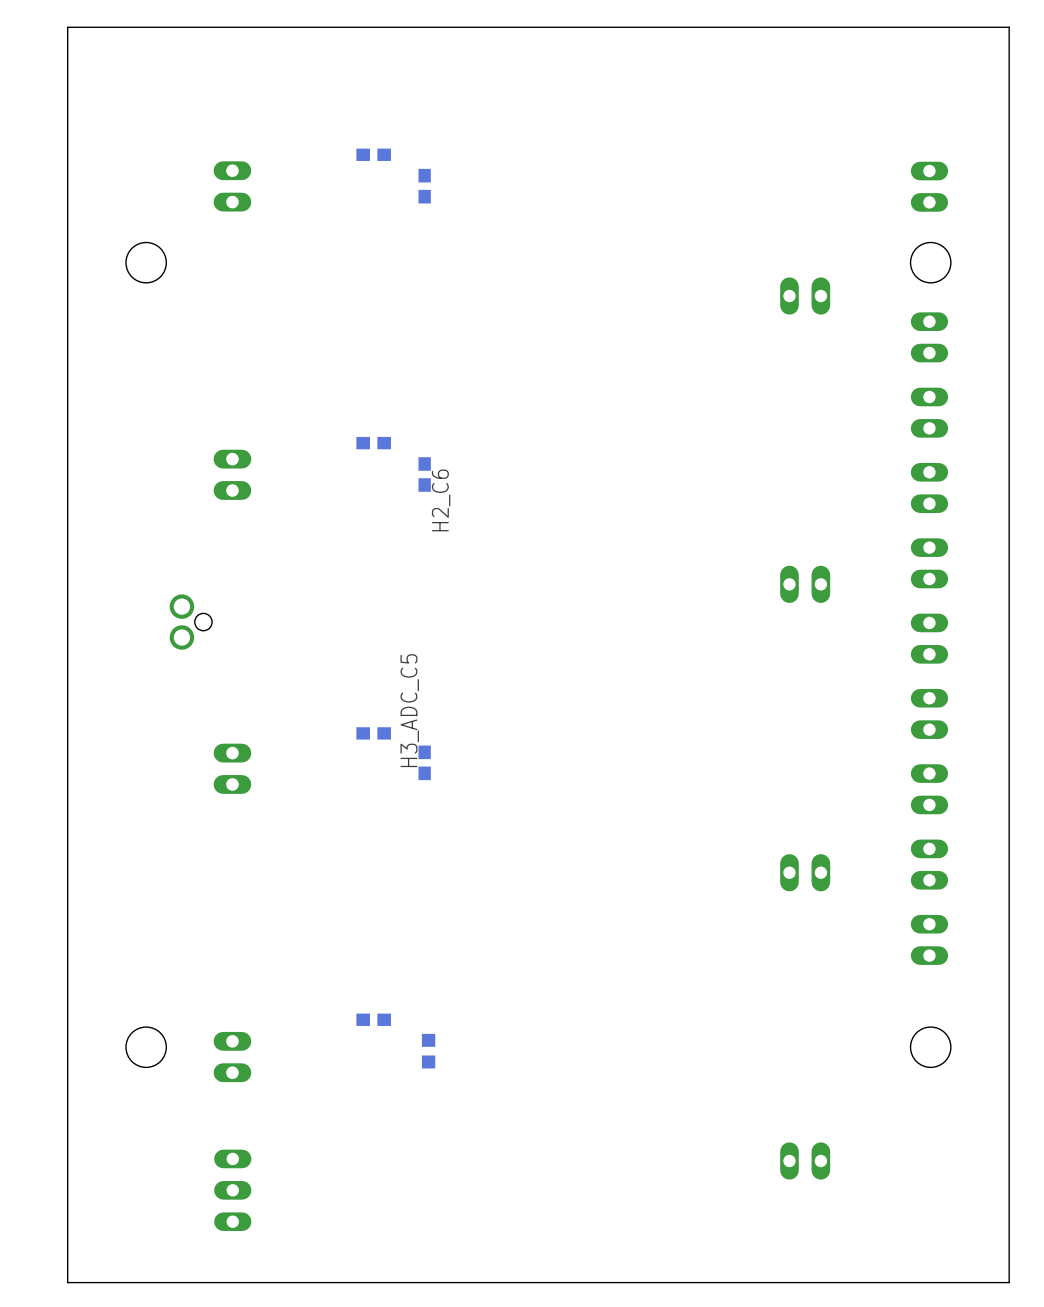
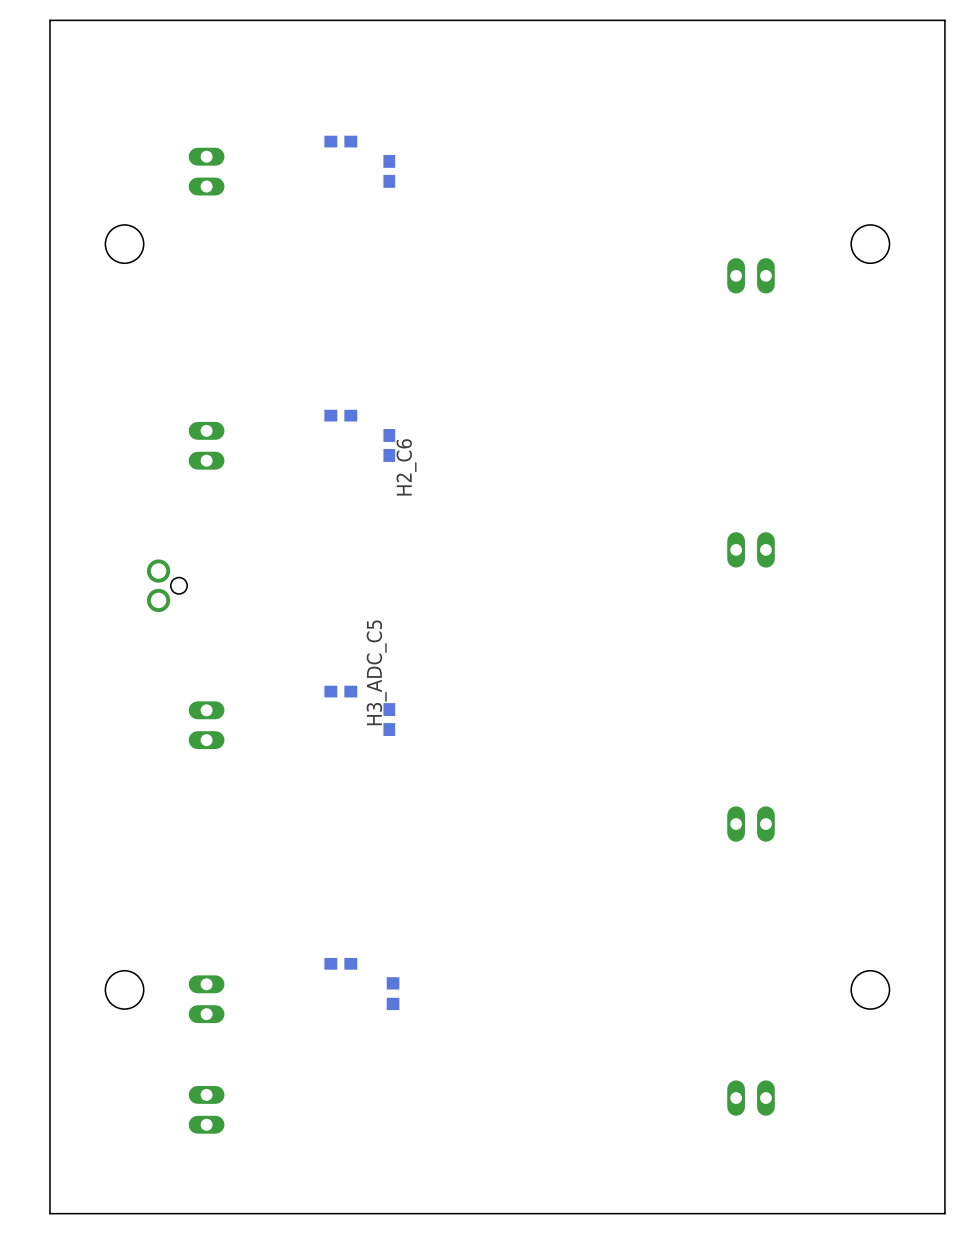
part: (929, 186) -> none
part: (929, 337) -> none
part: (929, 412) -> none
part: (929, 487) -> none
part: (929, 563) -> none
part: (929, 638) -> none
part: (929, 713) -> none
part: (929, 789) -> none
part: (929, 864) -> none
part: (929, 939) -> none
part: none -> (206, 1109)
part: (232, 1190) -> none

